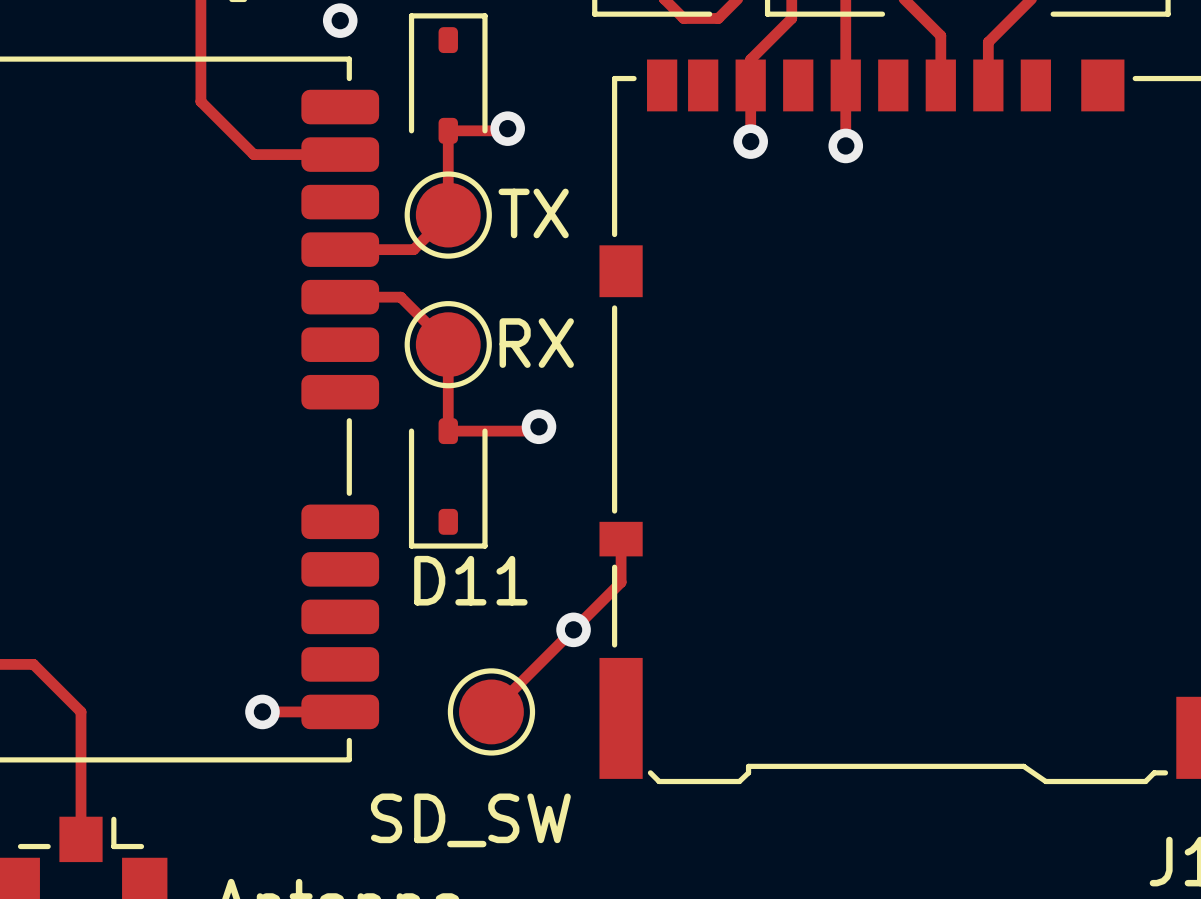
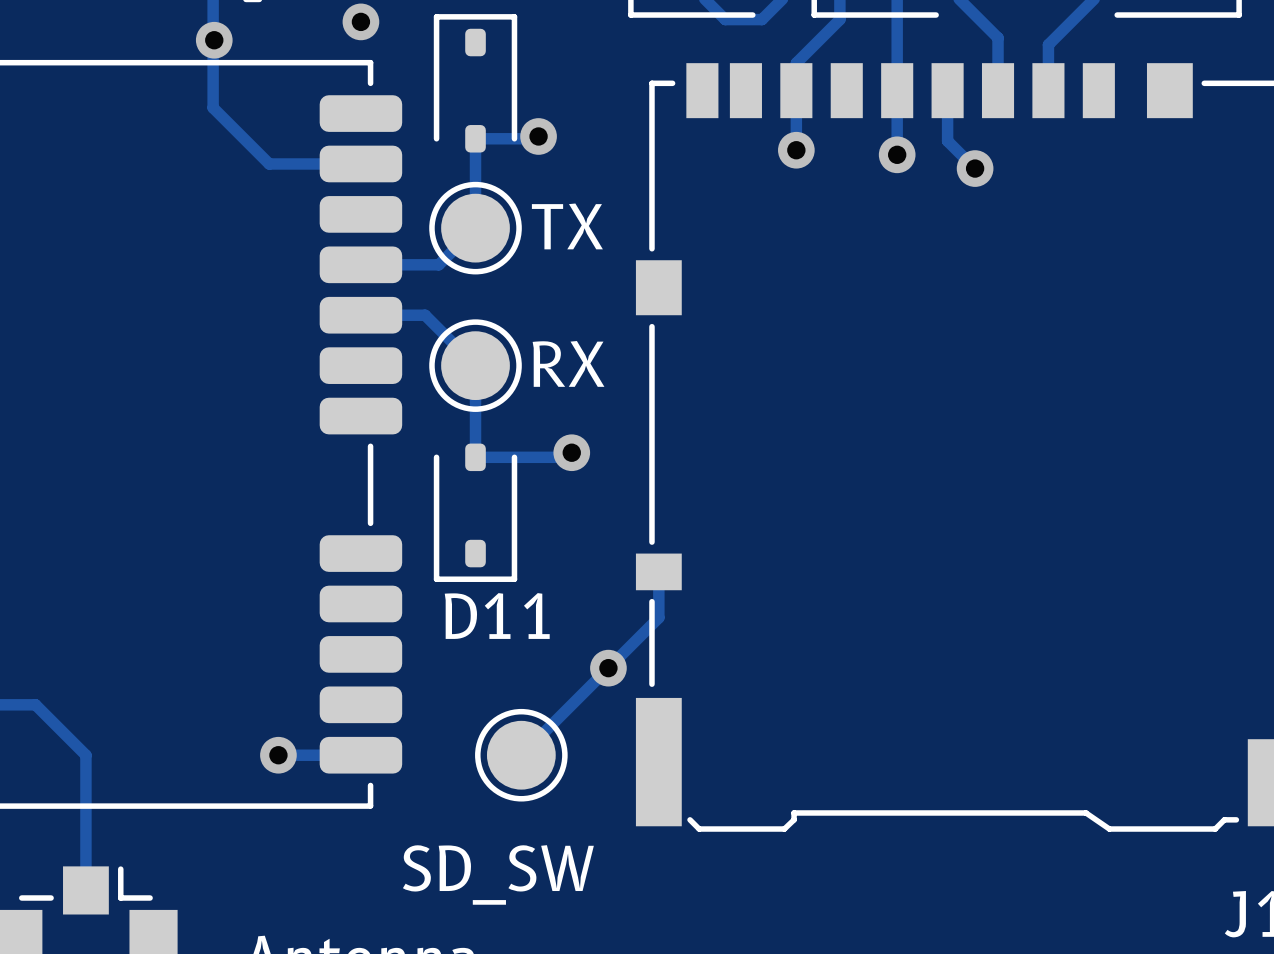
via: none -> (214, 40)
track: none -> (947, 90) (947, 141) (975, 168)
via: none -> (975, 168)

